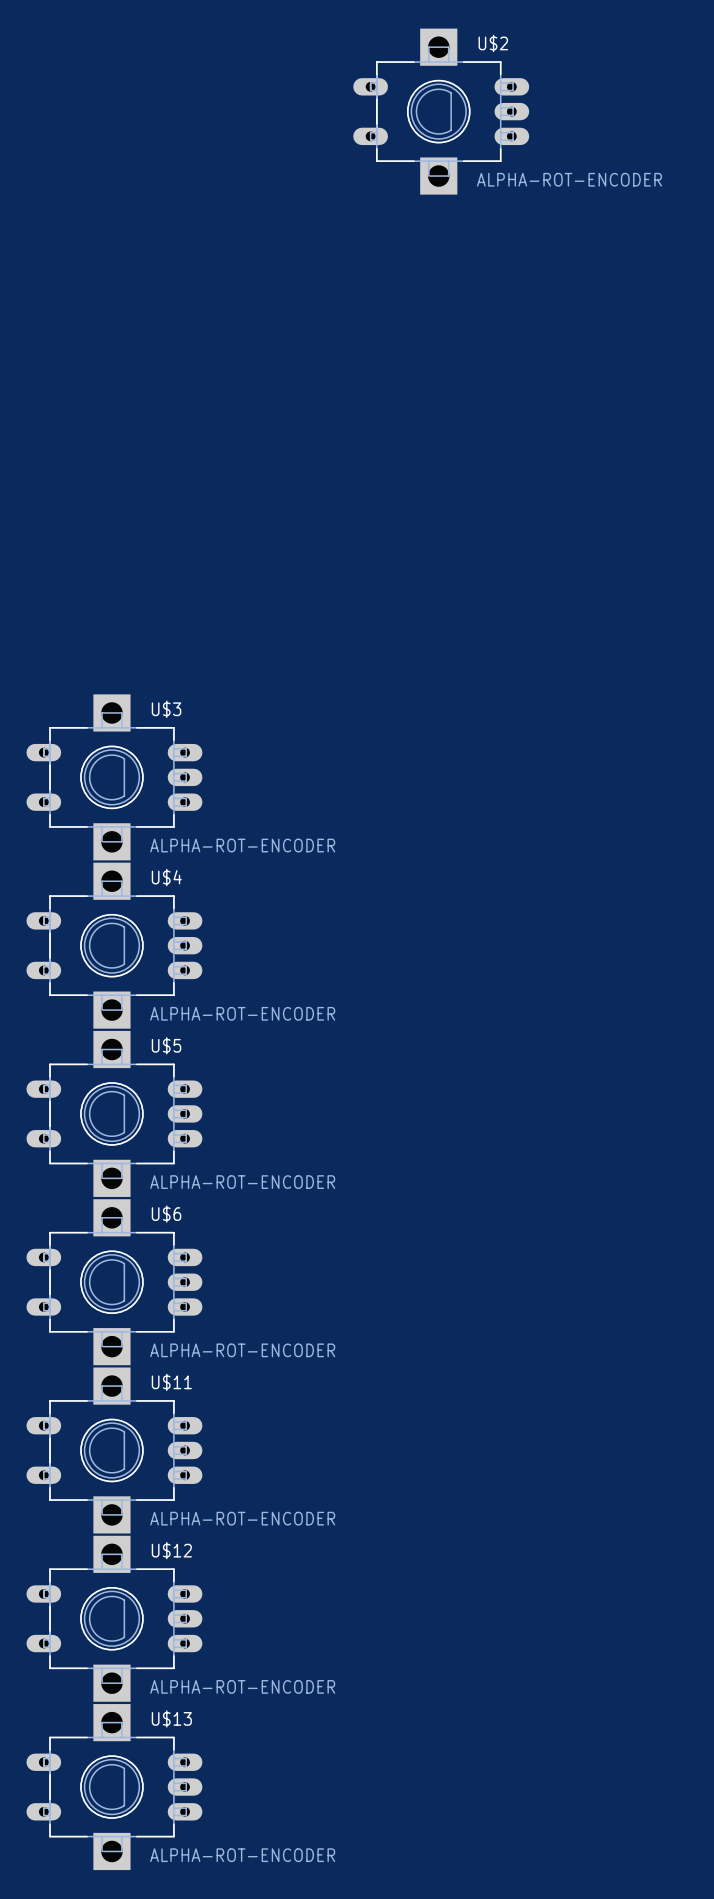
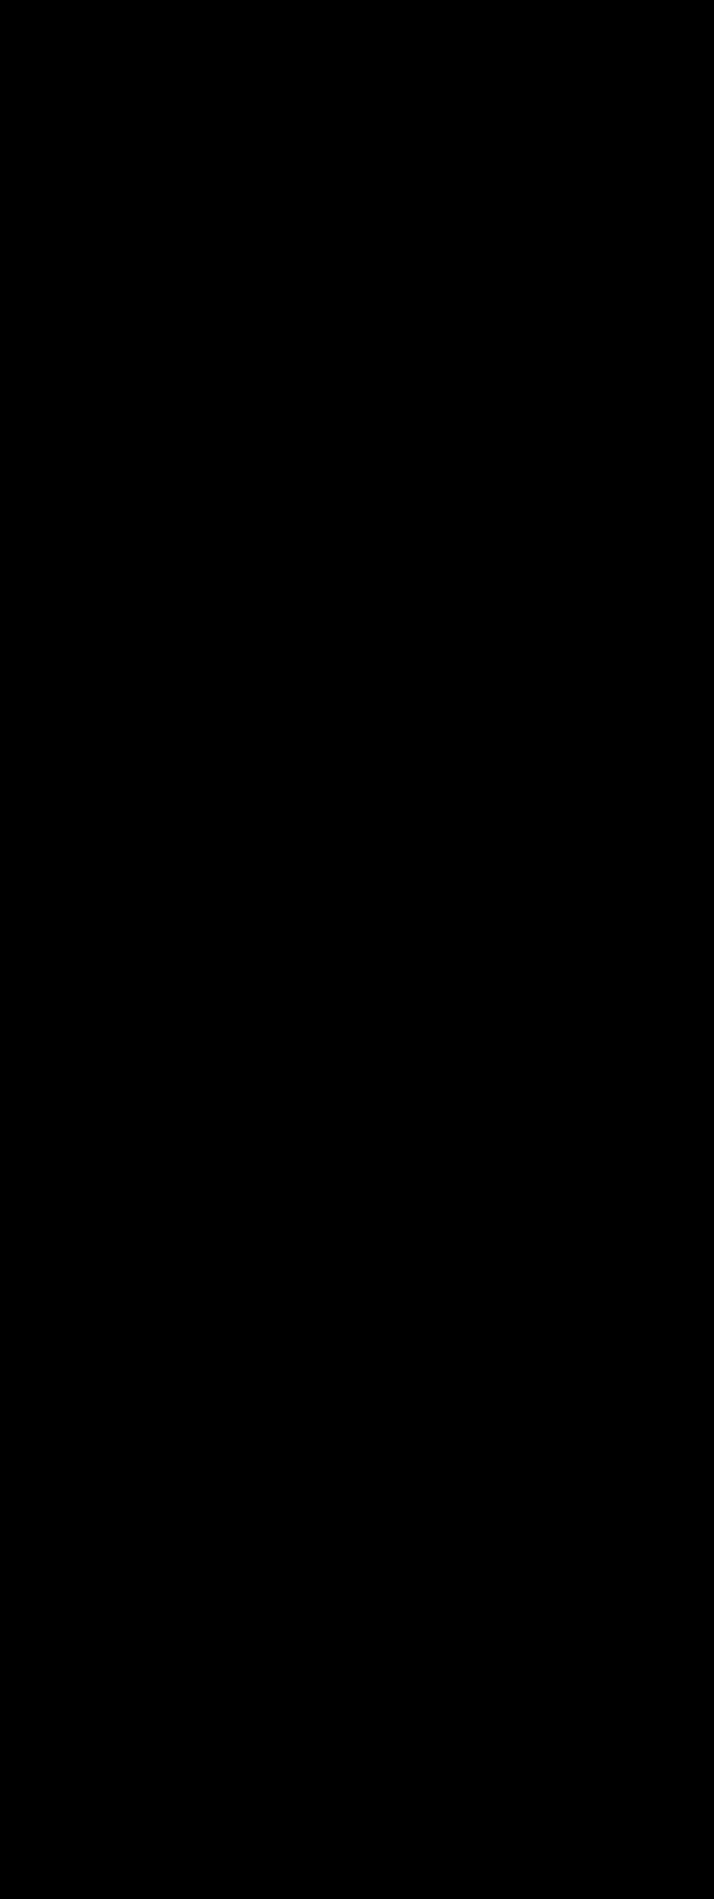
U$2: ALPHA-ROT-ENCODER (441, 111) -> none
U$3: ALPHA-ROT-ENCODER (114, 777) -> none
U$4: ALPHA-ROT-ENCODER (114, 945) -> none
U$5: ALPHA-ROT-ENCODER (114, 1113) -> none
U$6: ALPHA-ROT-ENCODER (114, 1282) -> none
U$11: ALPHA-ROT-ENCODER (114, 1450) -> none
U$12: ALPHA-ROT-ENCODER (114, 1618) -> none
U$13: ALPHA-ROT-ENCODER (114, 1787) -> none

